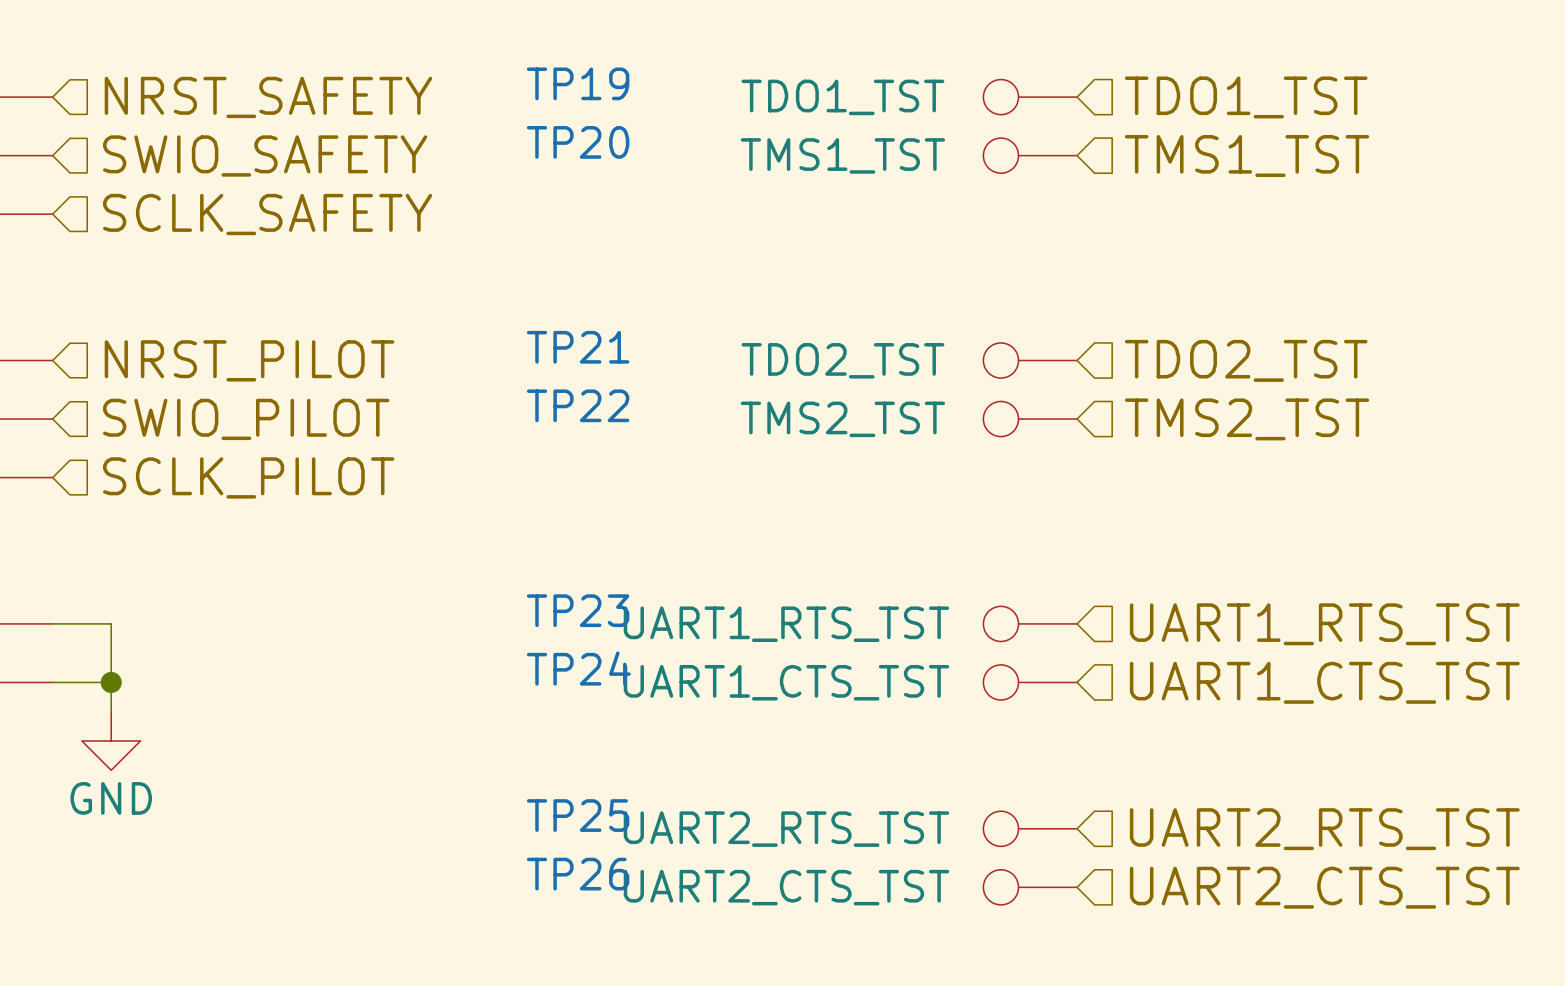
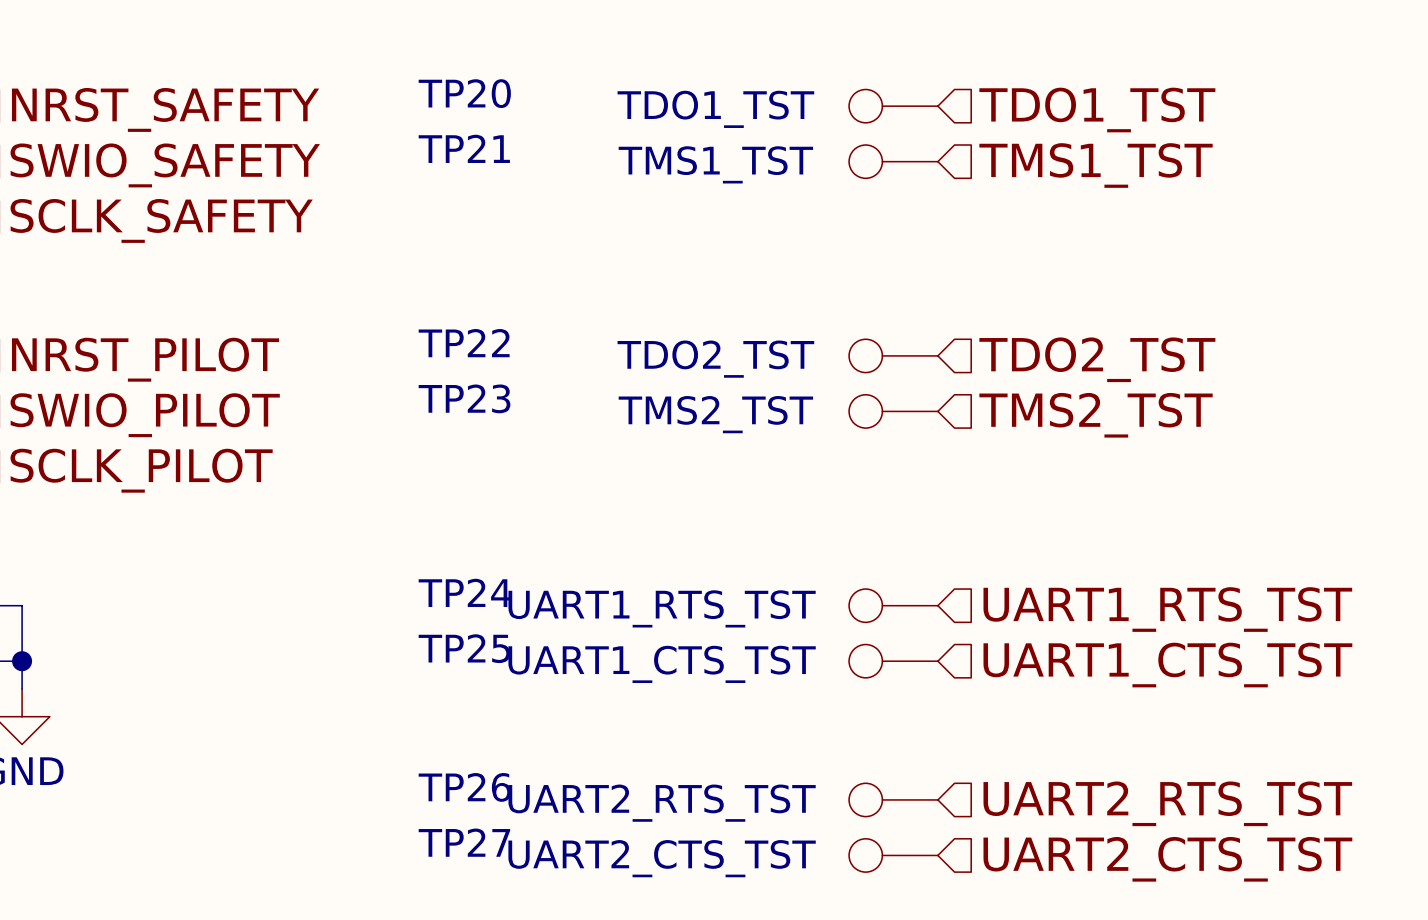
TP19 name: TP19 (578, 83) -> TP20 (464, 93)
TP20 name: TP20 (578, 142) -> TP21 (464, 148)
TP21 name: TP21 (578, 347) -> TP22 (464, 343)
TP22 name: TP22 (578, 405) -> TP23 (464, 398)
TP23 name: TP23 (578, 610) -> TP24 (464, 592)
TP24 name: TP24 (578, 668) -> TP25 (464, 648)
TP25 name: TP25 (578, 815) -> TP26 (464, 787)
TP26 name: TP26 (578, 874) -> TP27 (464, 842)

